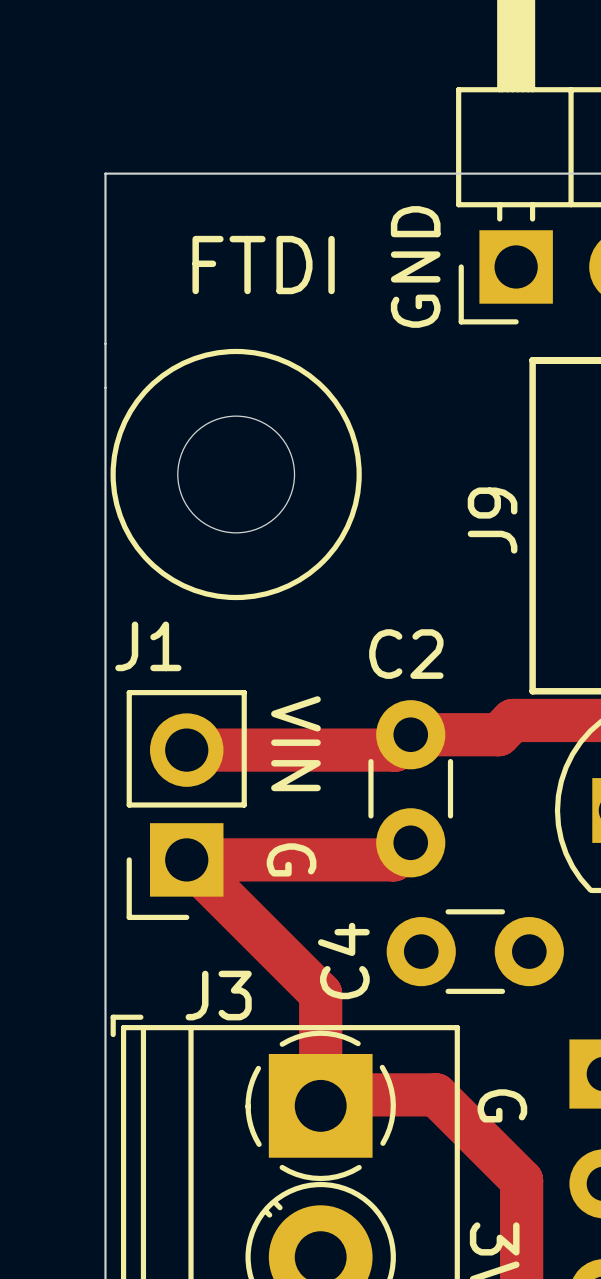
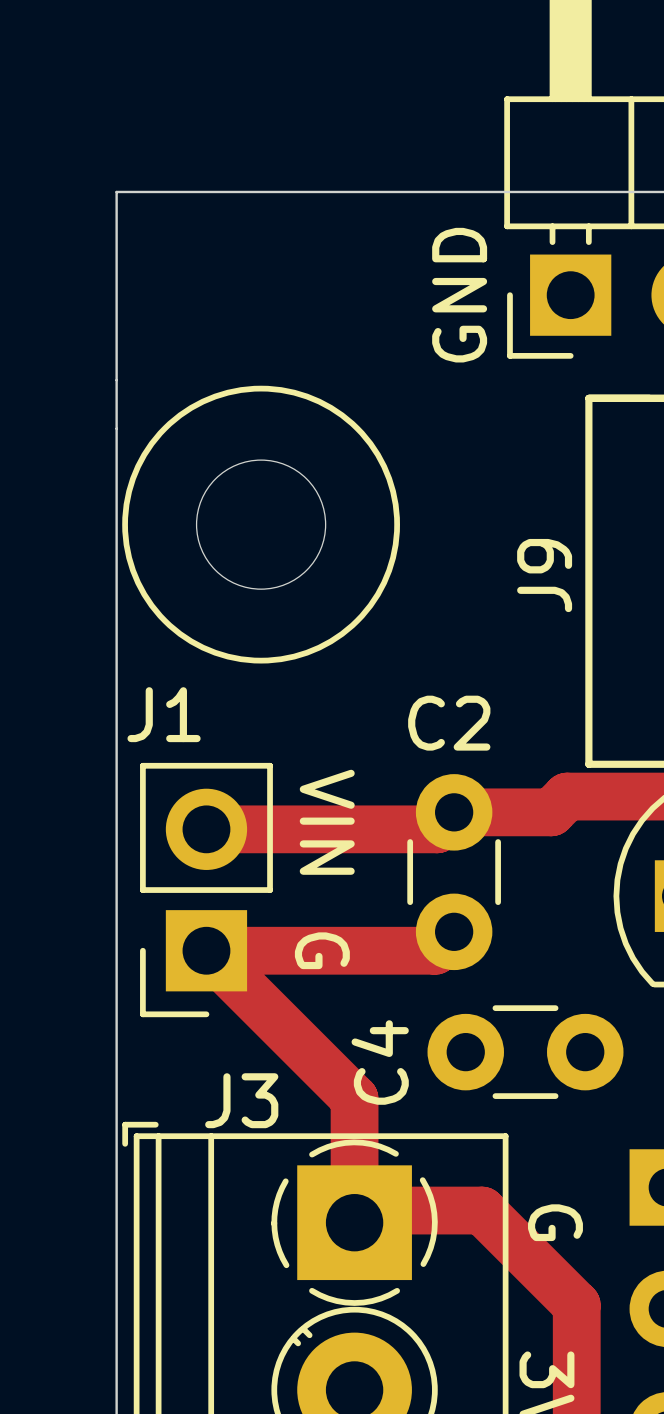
text: FTDI (263, 265) -> none

